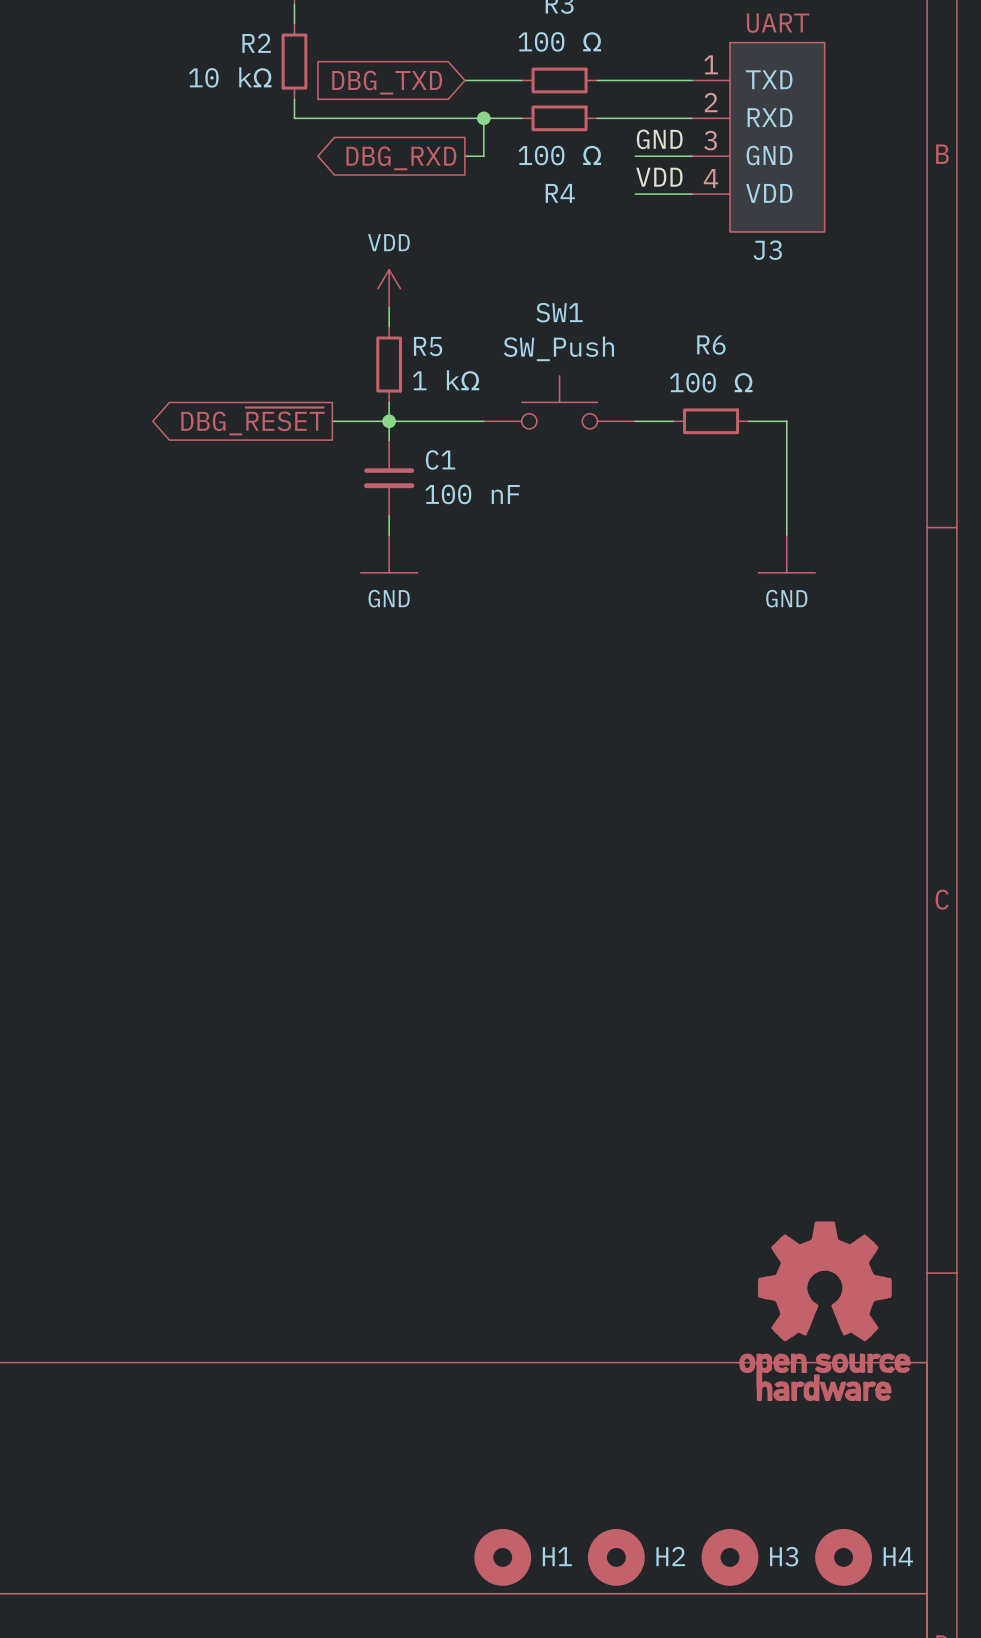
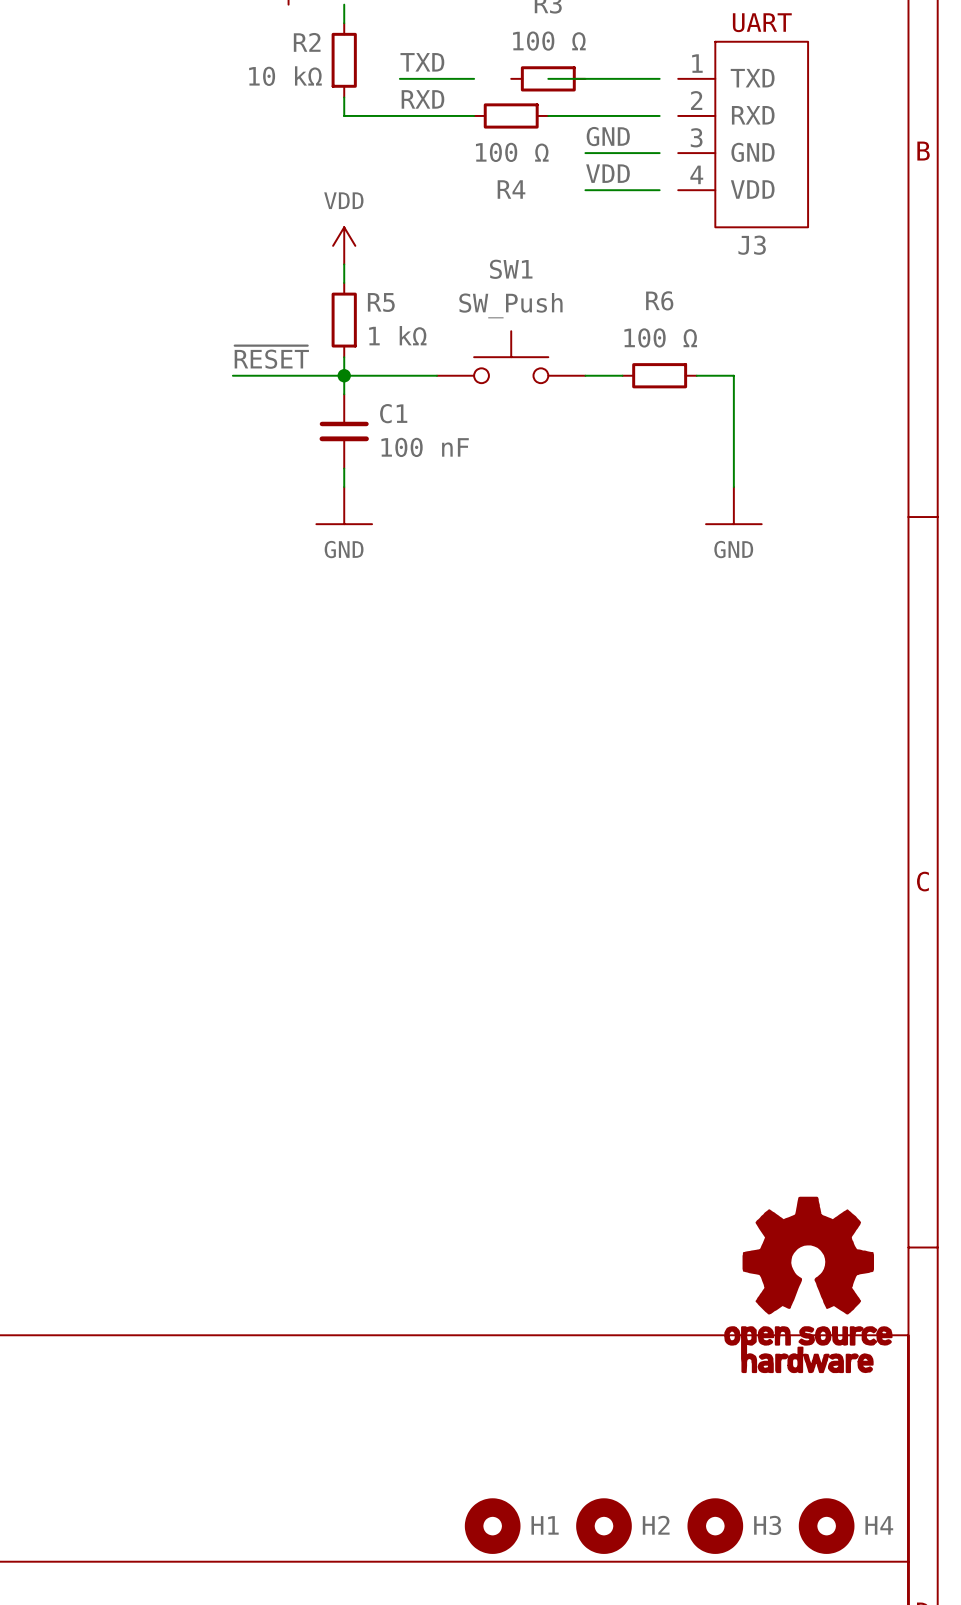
wire: (294, 4) (294, 23) -> (344, 4) (344, 23)
R2 position: (294, 61) -> (344, 60)
label: none -> TXD (422, 62)
wire: none -> (399, 78) (455, 78)
wire: (483, 80) (521, 80) -> (548, 78) (585, 78)
wire: (673, 80) (692, 80) -> none
global label: DBG_TXD (387, 82) -> none
wire: (294, 99) (294, 118) (351, 118) -> (344, 97) (344, 115)
label: none -> RXD (422, 99)
junction: (483, 118) -> none
wire: (521, 118) (483, 118) (483, 156) (464, 156) -> none
wire: none -> (548, 115) (585, 115)
R4 position: (559, 118) -> (511, 115)
wire: (673, 118) (692, 118) -> none
label position: GND (659, 139) -> GND (608, 136)
wire: none -> (585, 153) (622, 153)
wire: (673, 156) (692, 156) -> none
global label: DBG_RXD (401, 158) -> none
label position: VDD (659, 177) -> VDD (607, 173)
wire: none -> (585, 190) (622, 190)
wire: (673, 194) (692, 194) -> none
power symbol position: VDD (389, 288) -> VDD (344, 245)
wire: (389, 307) (389, 326) -> (344, 264) (344, 282)
label: none -> ~{RESET} (271, 357)
R5 position: (389, 364) -> (344, 320)
wire: none -> (232, 375) (436, 375)
wire: (389, 402) (389, 440) -> (344, 357) (344, 394)
SW1 position: (559, 402) -> (511, 357)
global label: DBG_~{RESET} (252, 421) -> none
wire: (332, 421) (483, 421) -> none
junction position: (389, 421) -> (344, 375)
wire: (635, 421) (673, 421) -> (585, 375) (622, 375)
R6 position: (711, 421) -> (659, 375)
wire: (748, 421) (786, 421) (786, 534) -> (696, 375) (733, 375) (733, 487)
C1 position: (389, 478) -> (344, 431)
wire: (389, 515) (389, 534) -> (344, 468) (344, 487)
power symbol position: GND (389, 553) -> GND (344, 505)
power symbol position: GND (786, 553) -> GND (733, 505)

